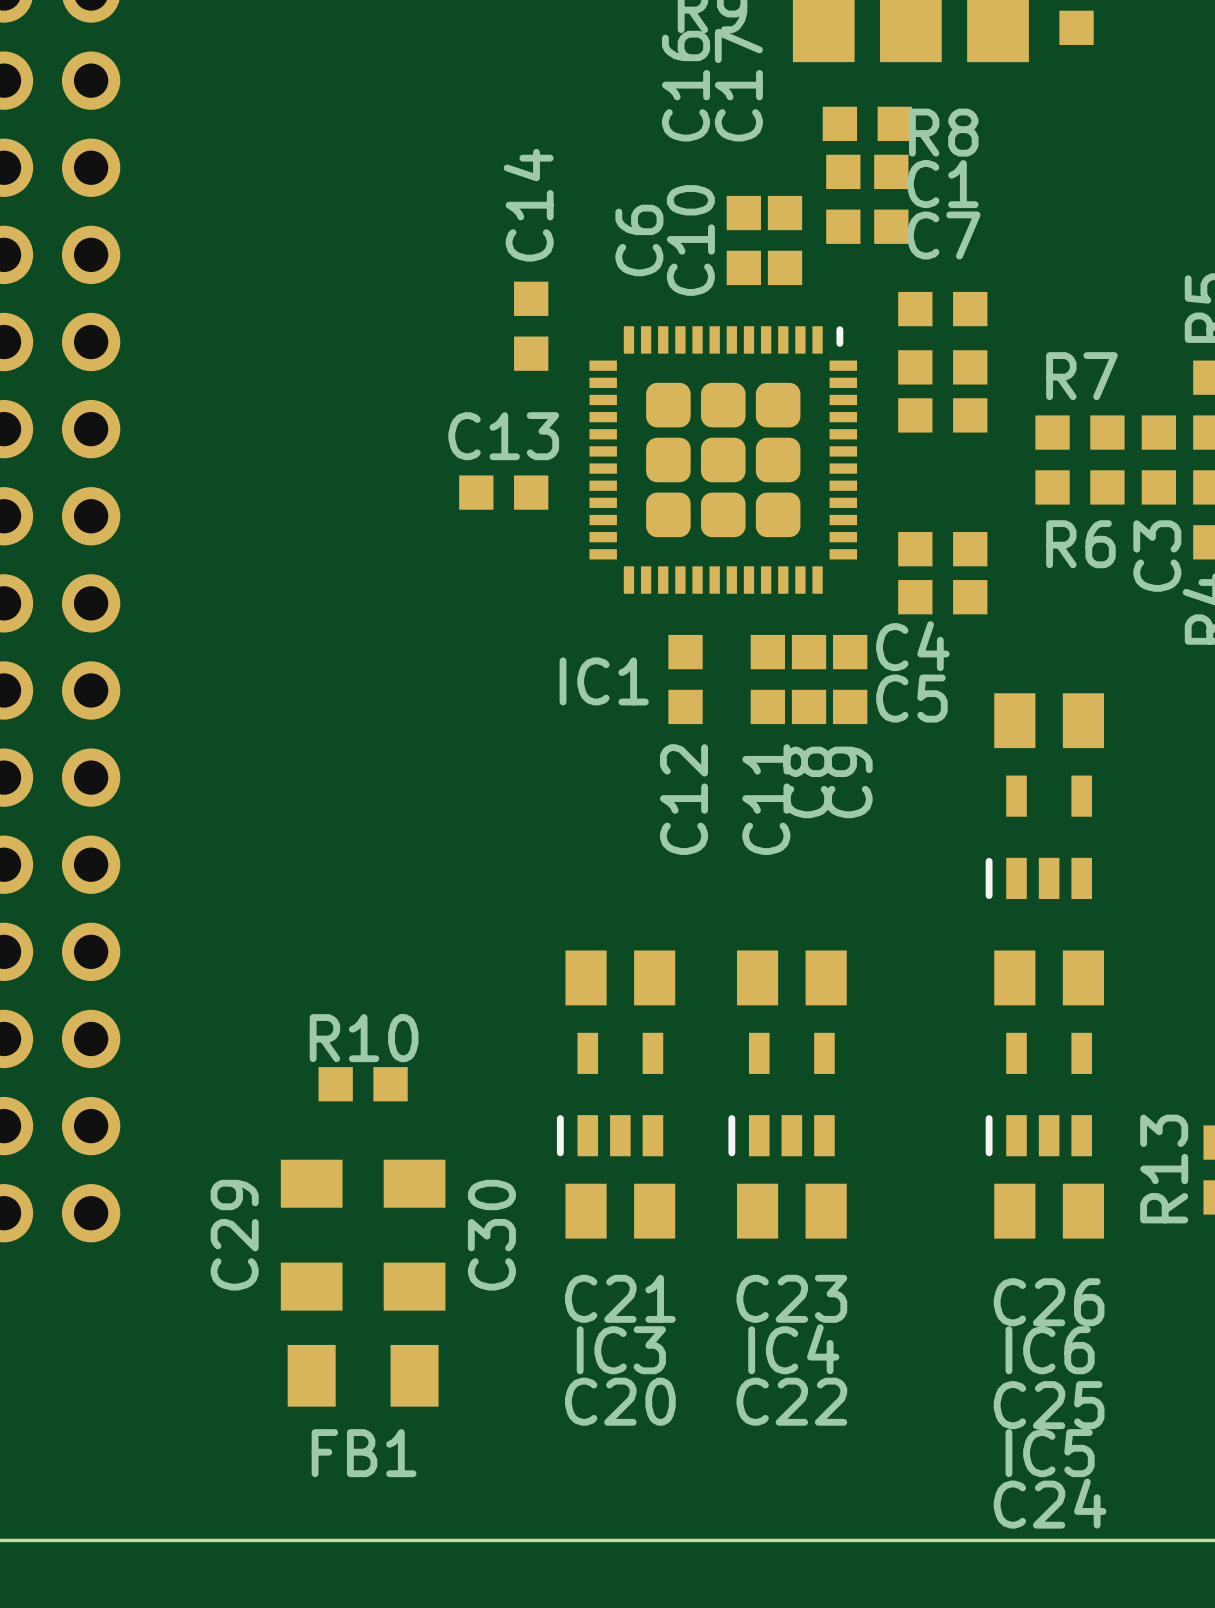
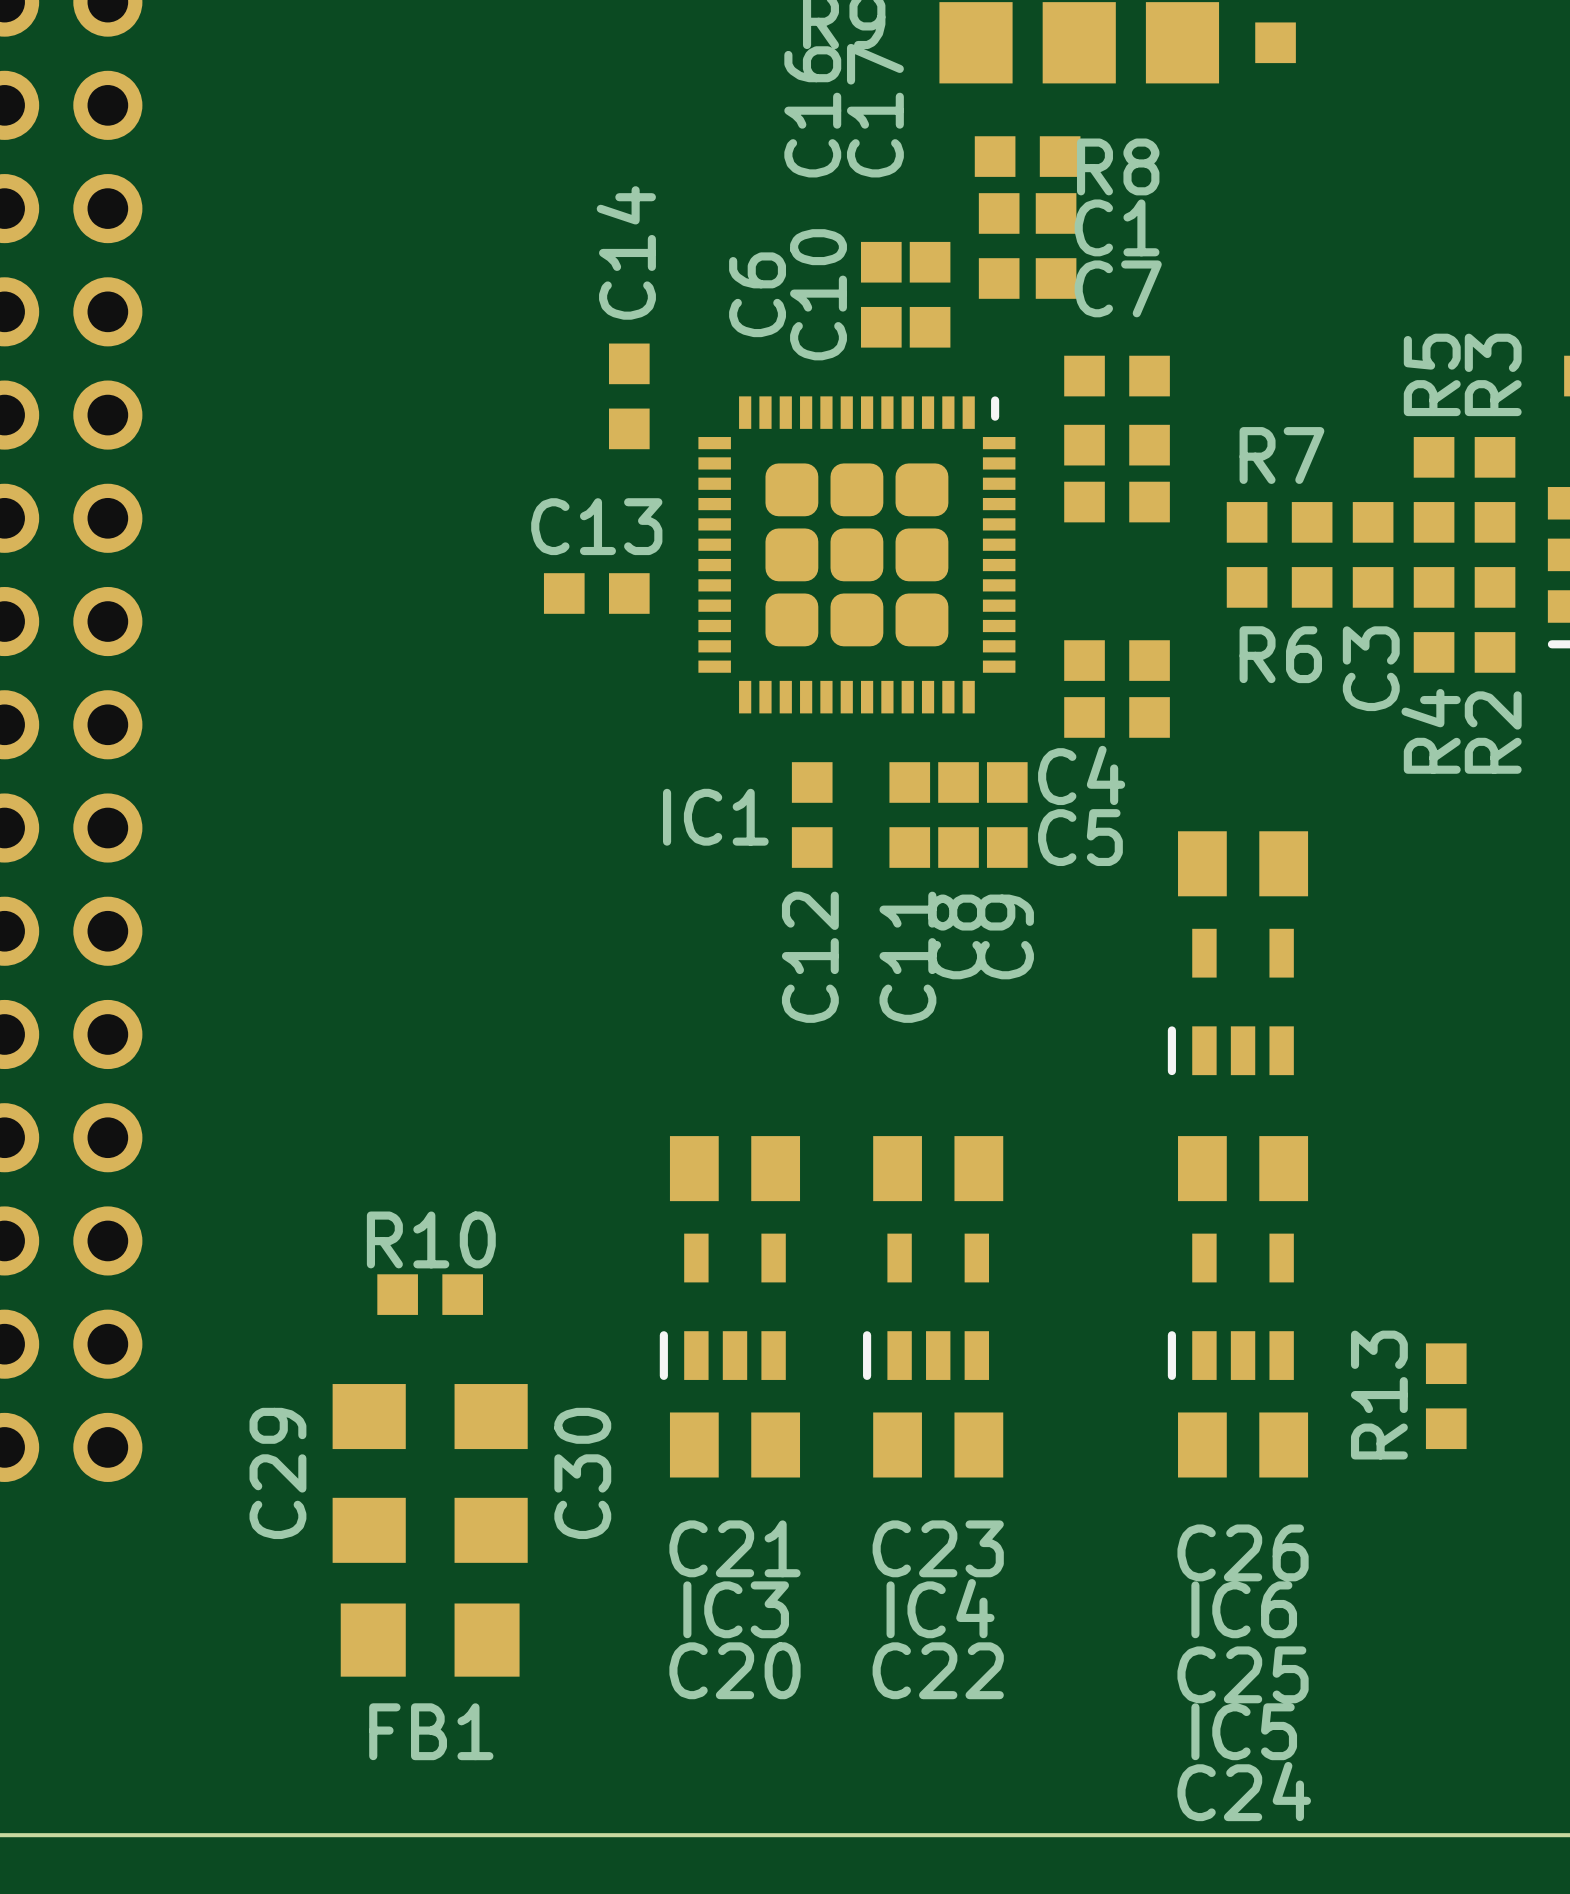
C29 footprint: [280, 1159, 343, 1311] -> [332, 1384, 406, 1563]
C30 footprint: [383, 1159, 446, 1311] -> [454, 1384, 528, 1563]
FB1 footprint: [287, 1344, 439, 1407] -> [340, 1603, 520, 1677]

